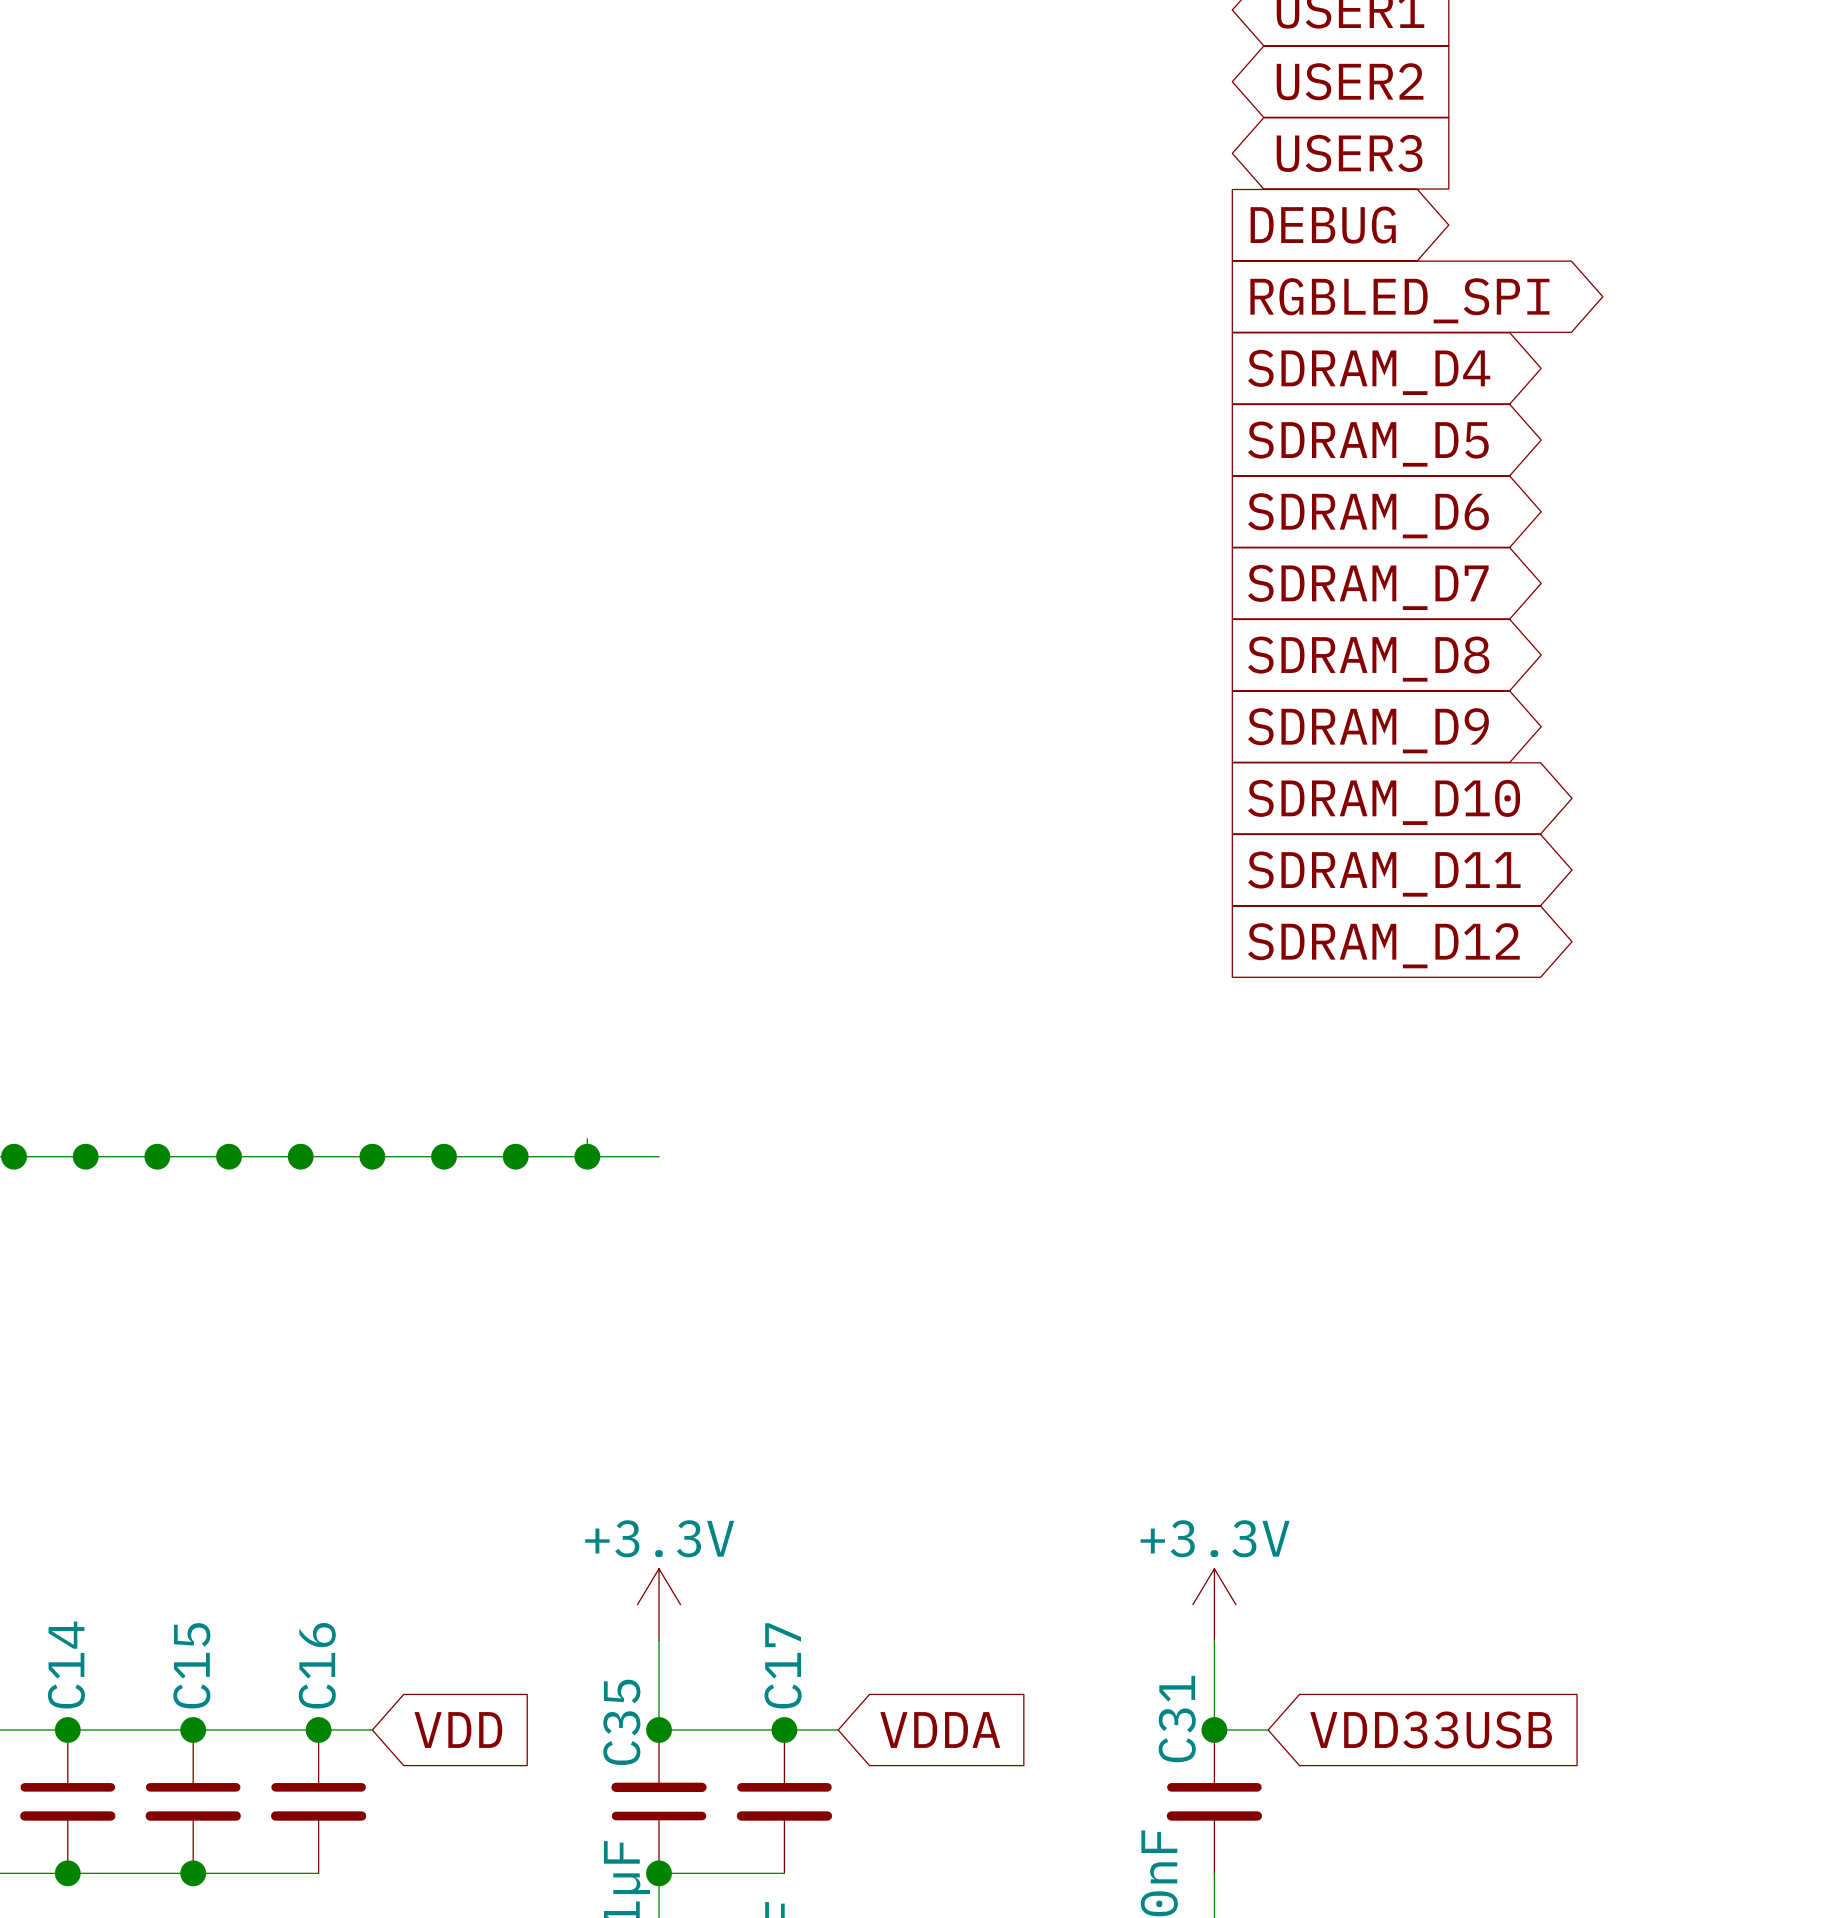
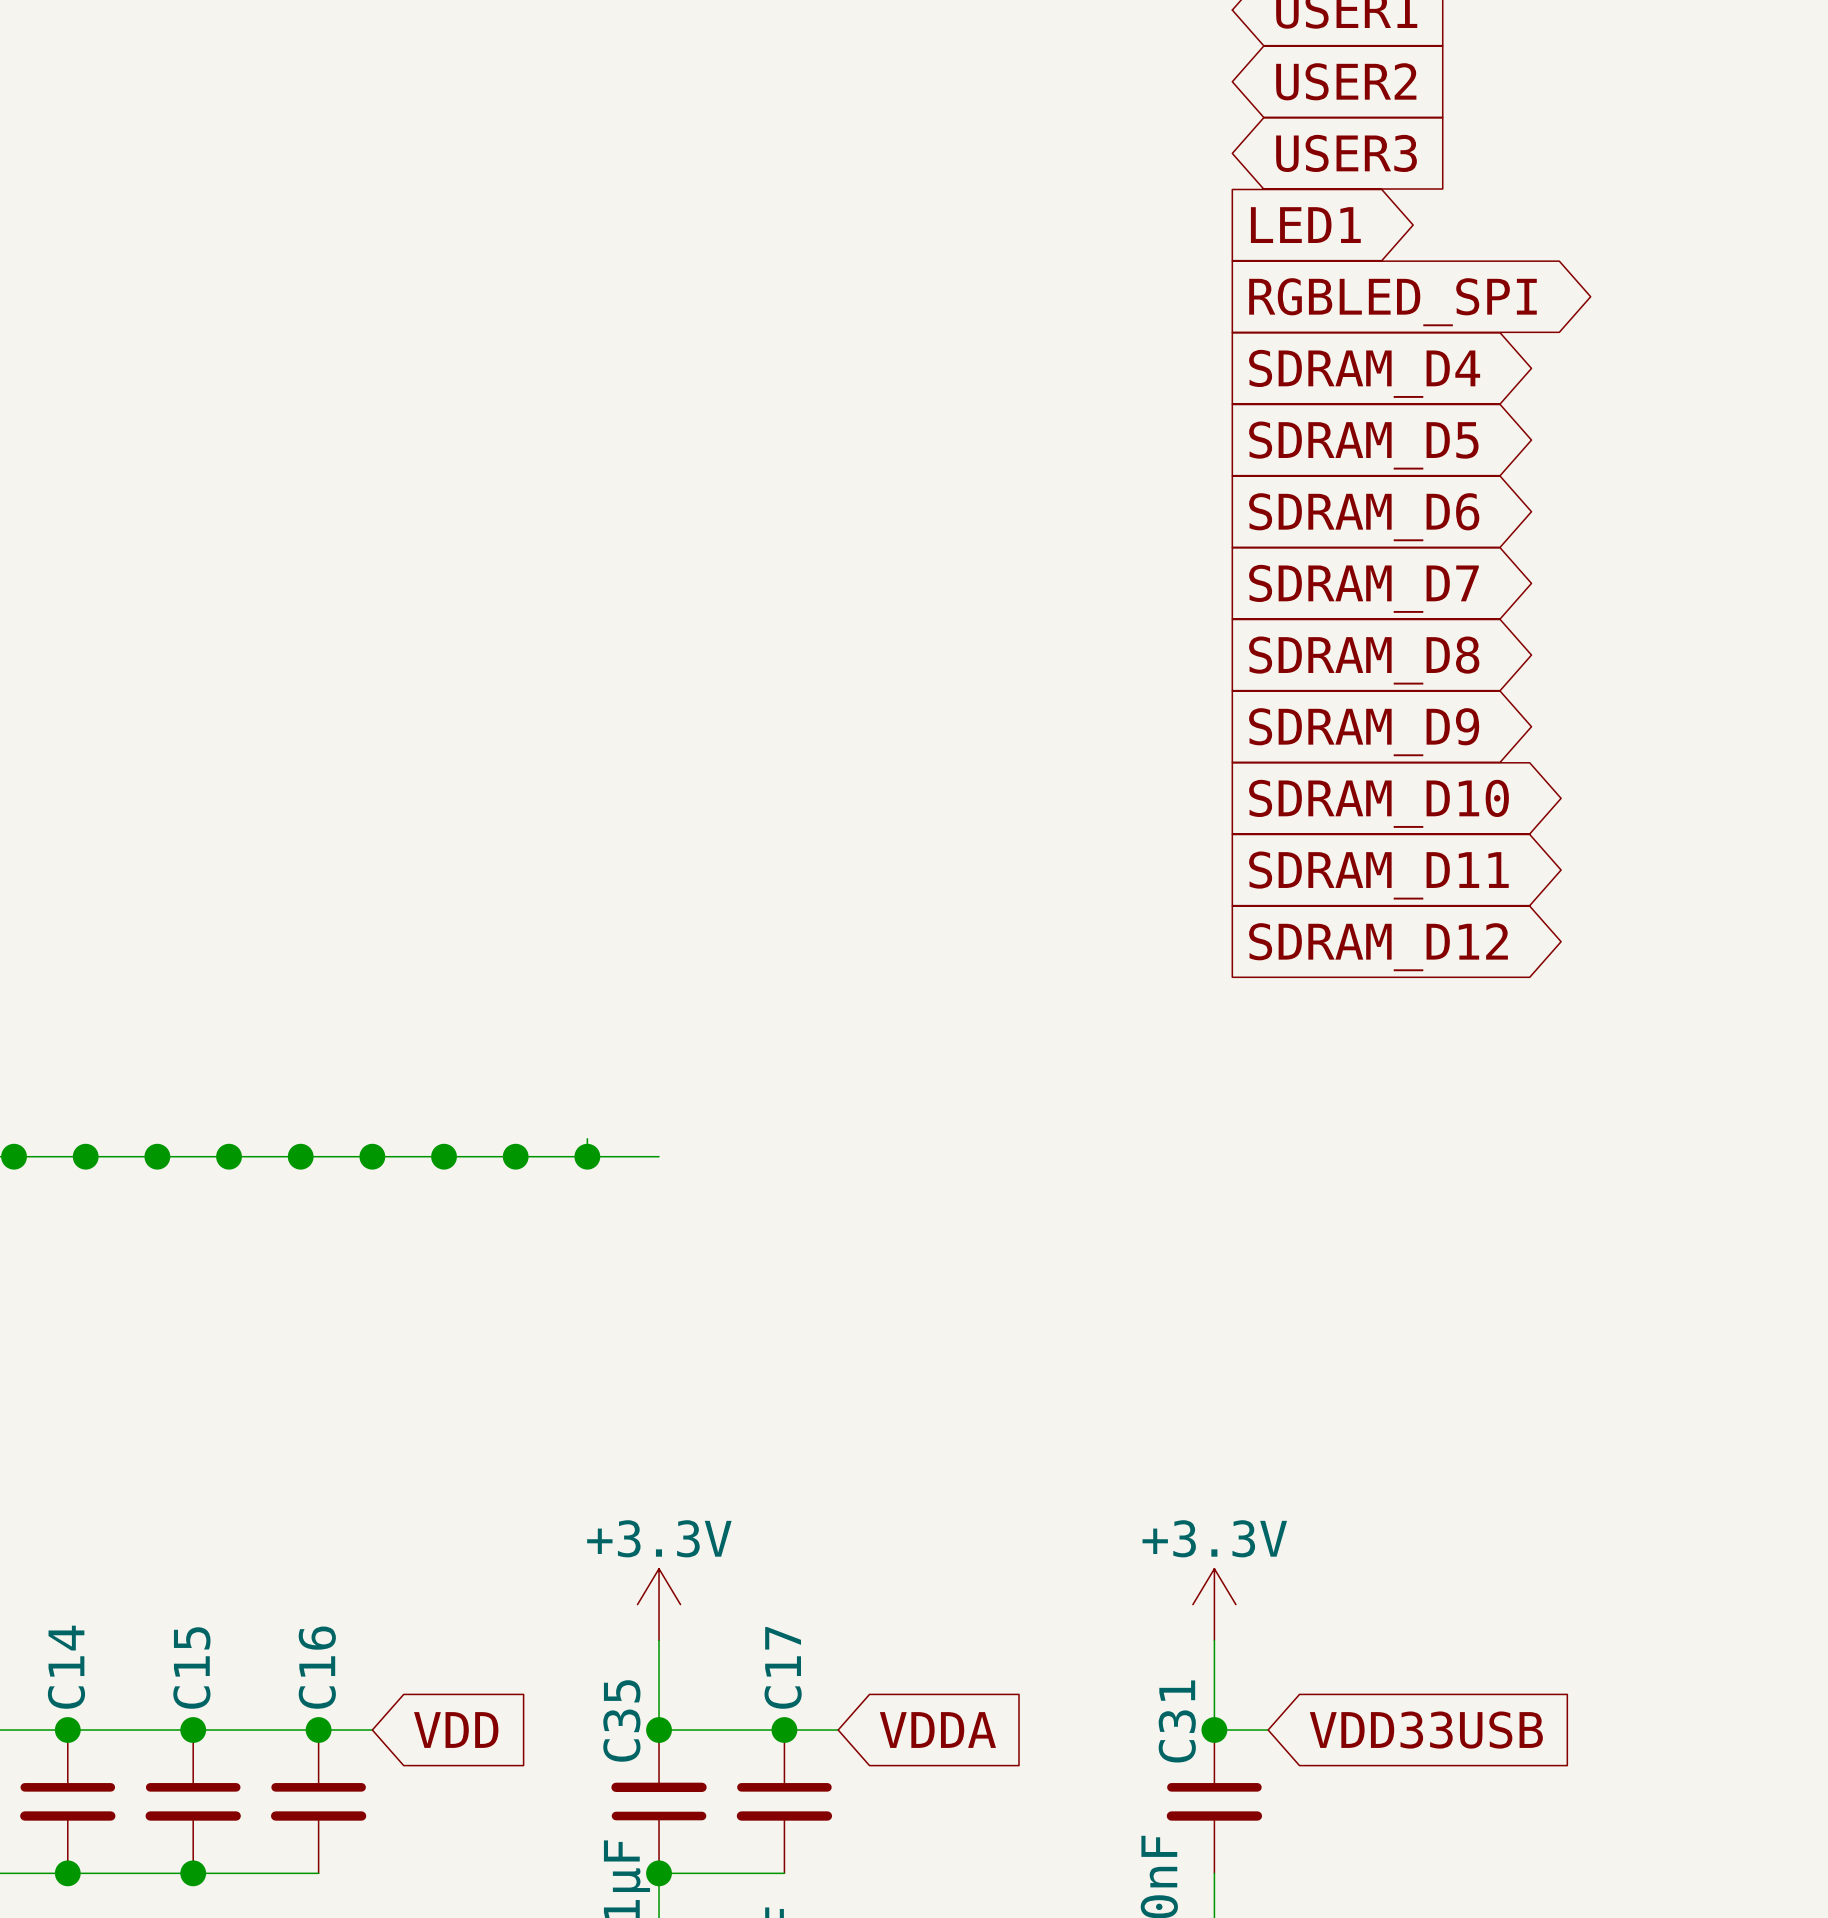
global label: DEBUG (1323, 225) -> LED1 (1305, 225)

